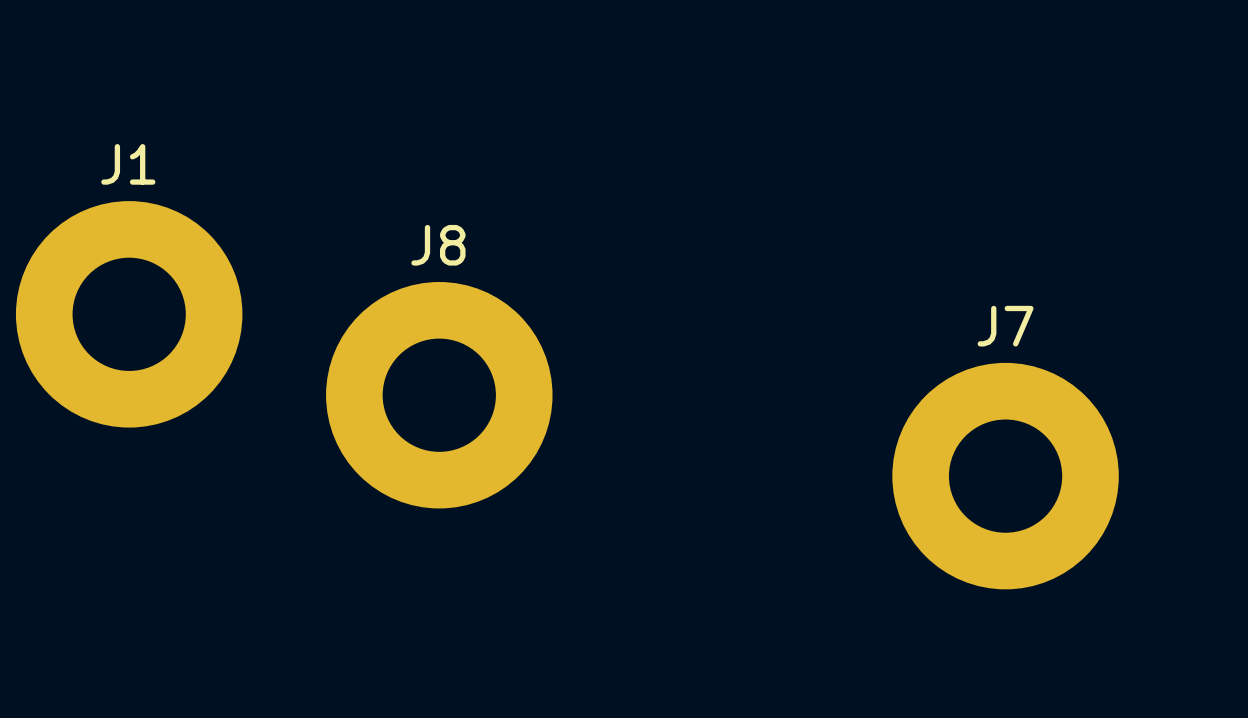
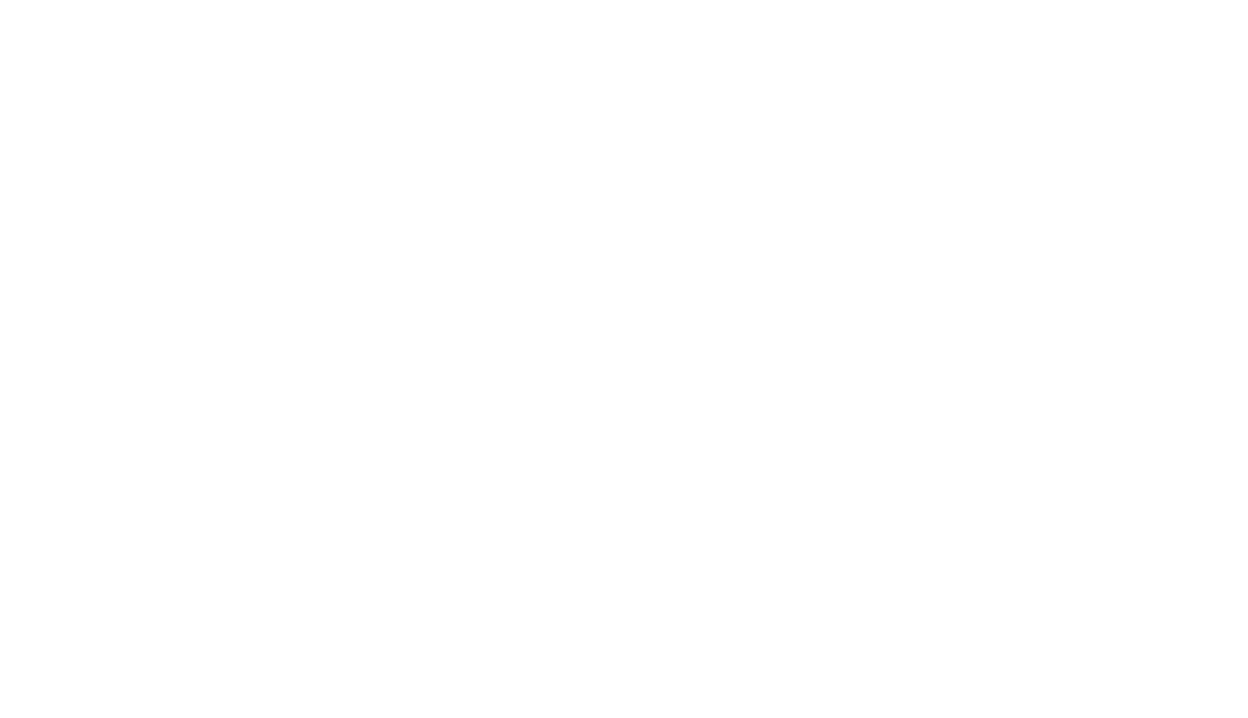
J1: (129, 314) -> none
J8: (439, 395) -> none
J7: (1005, 476) -> none

